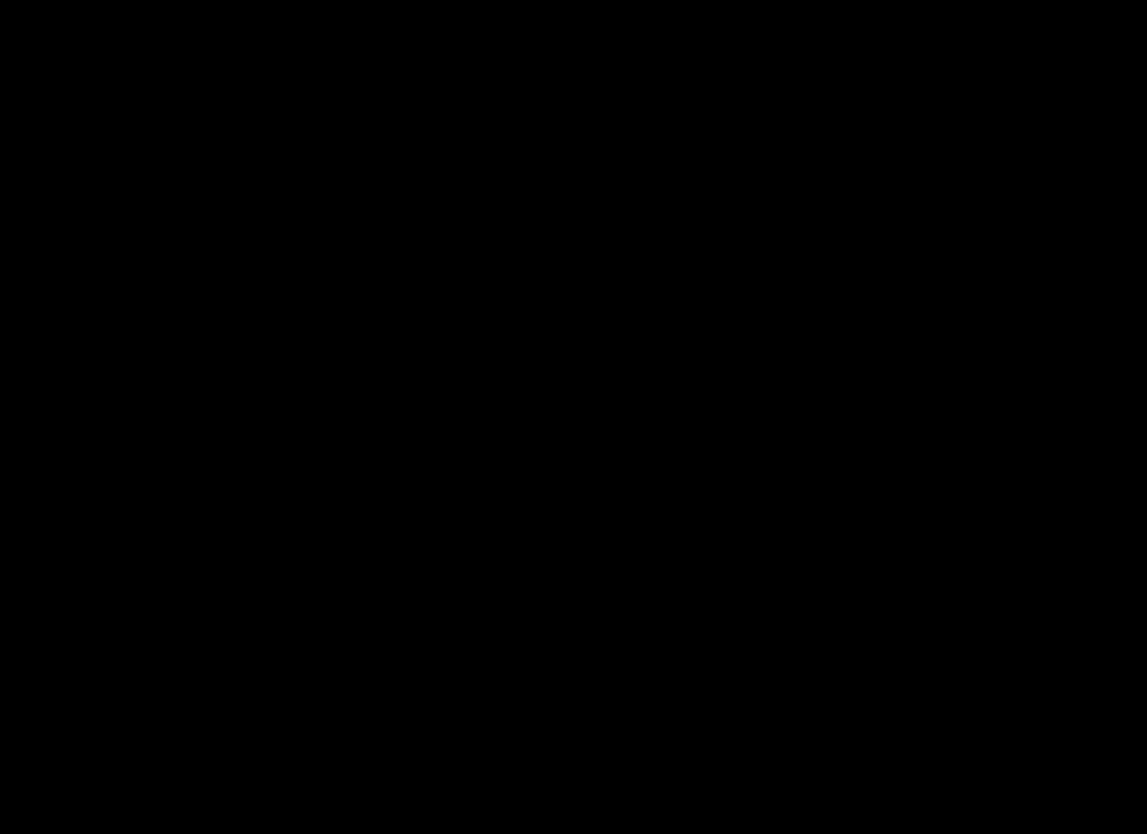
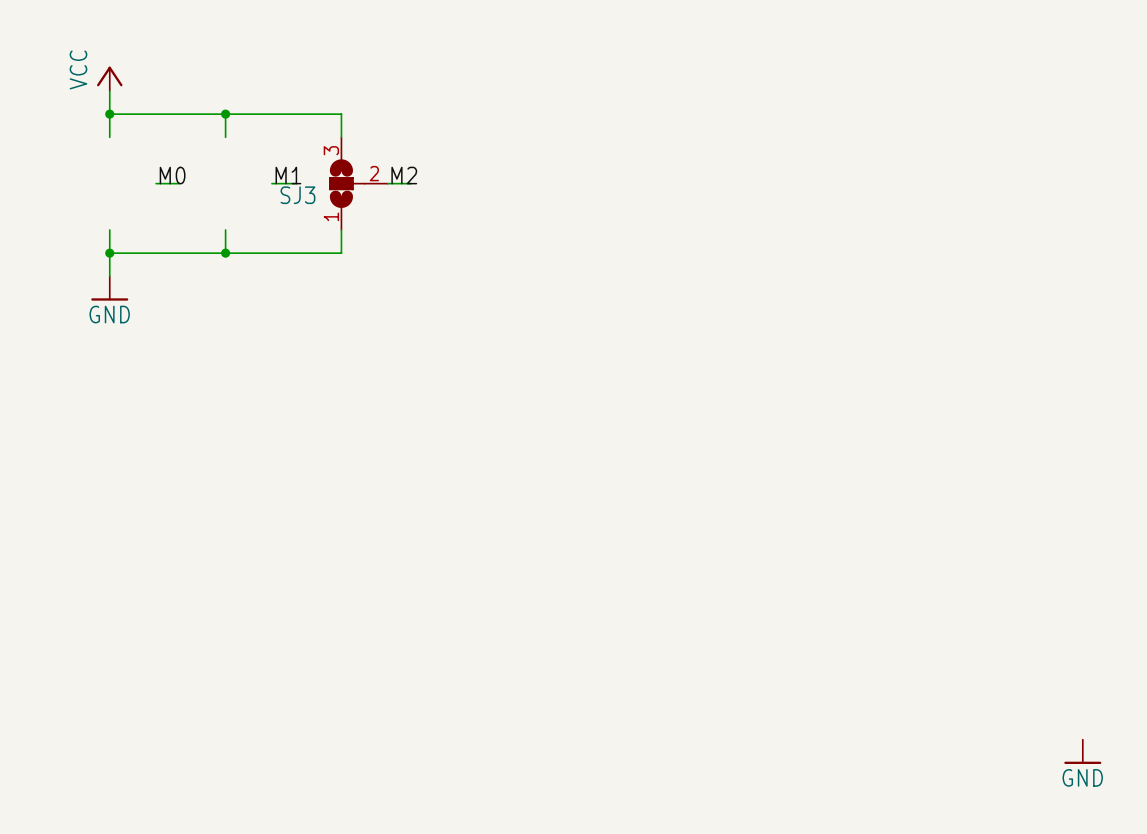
power symbol: none -> VCC (109, 78)
wire: none -> (109, 90) (109, 137)
wire: none -> (109, 114) (341, 114) (341, 137)
junction: none -> (109, 114)
wire: none -> (225, 114) (225, 137)
junction: none -> (225, 114)
label: none -> M0 (172, 175)
label: none -> M1 (288, 175)
label: none -> M2 (404, 175)
wire: none -> (156, 183) (179, 183)
wire: none -> (271, 183) (295, 183)
SJ3: none -> (358, 183)
wire: none -> (387, 183) (410, 183)
wire: none -> (109, 229) (109, 276)
wire: none -> (225, 229) (225, 253)
wire: none -> (341, 229) (341, 253) (109, 253)
junction: none -> (109, 253)
junction: none -> (225, 253)
power symbol: none -> GND (109, 288)
power symbol: none -> GND (1082, 751)

